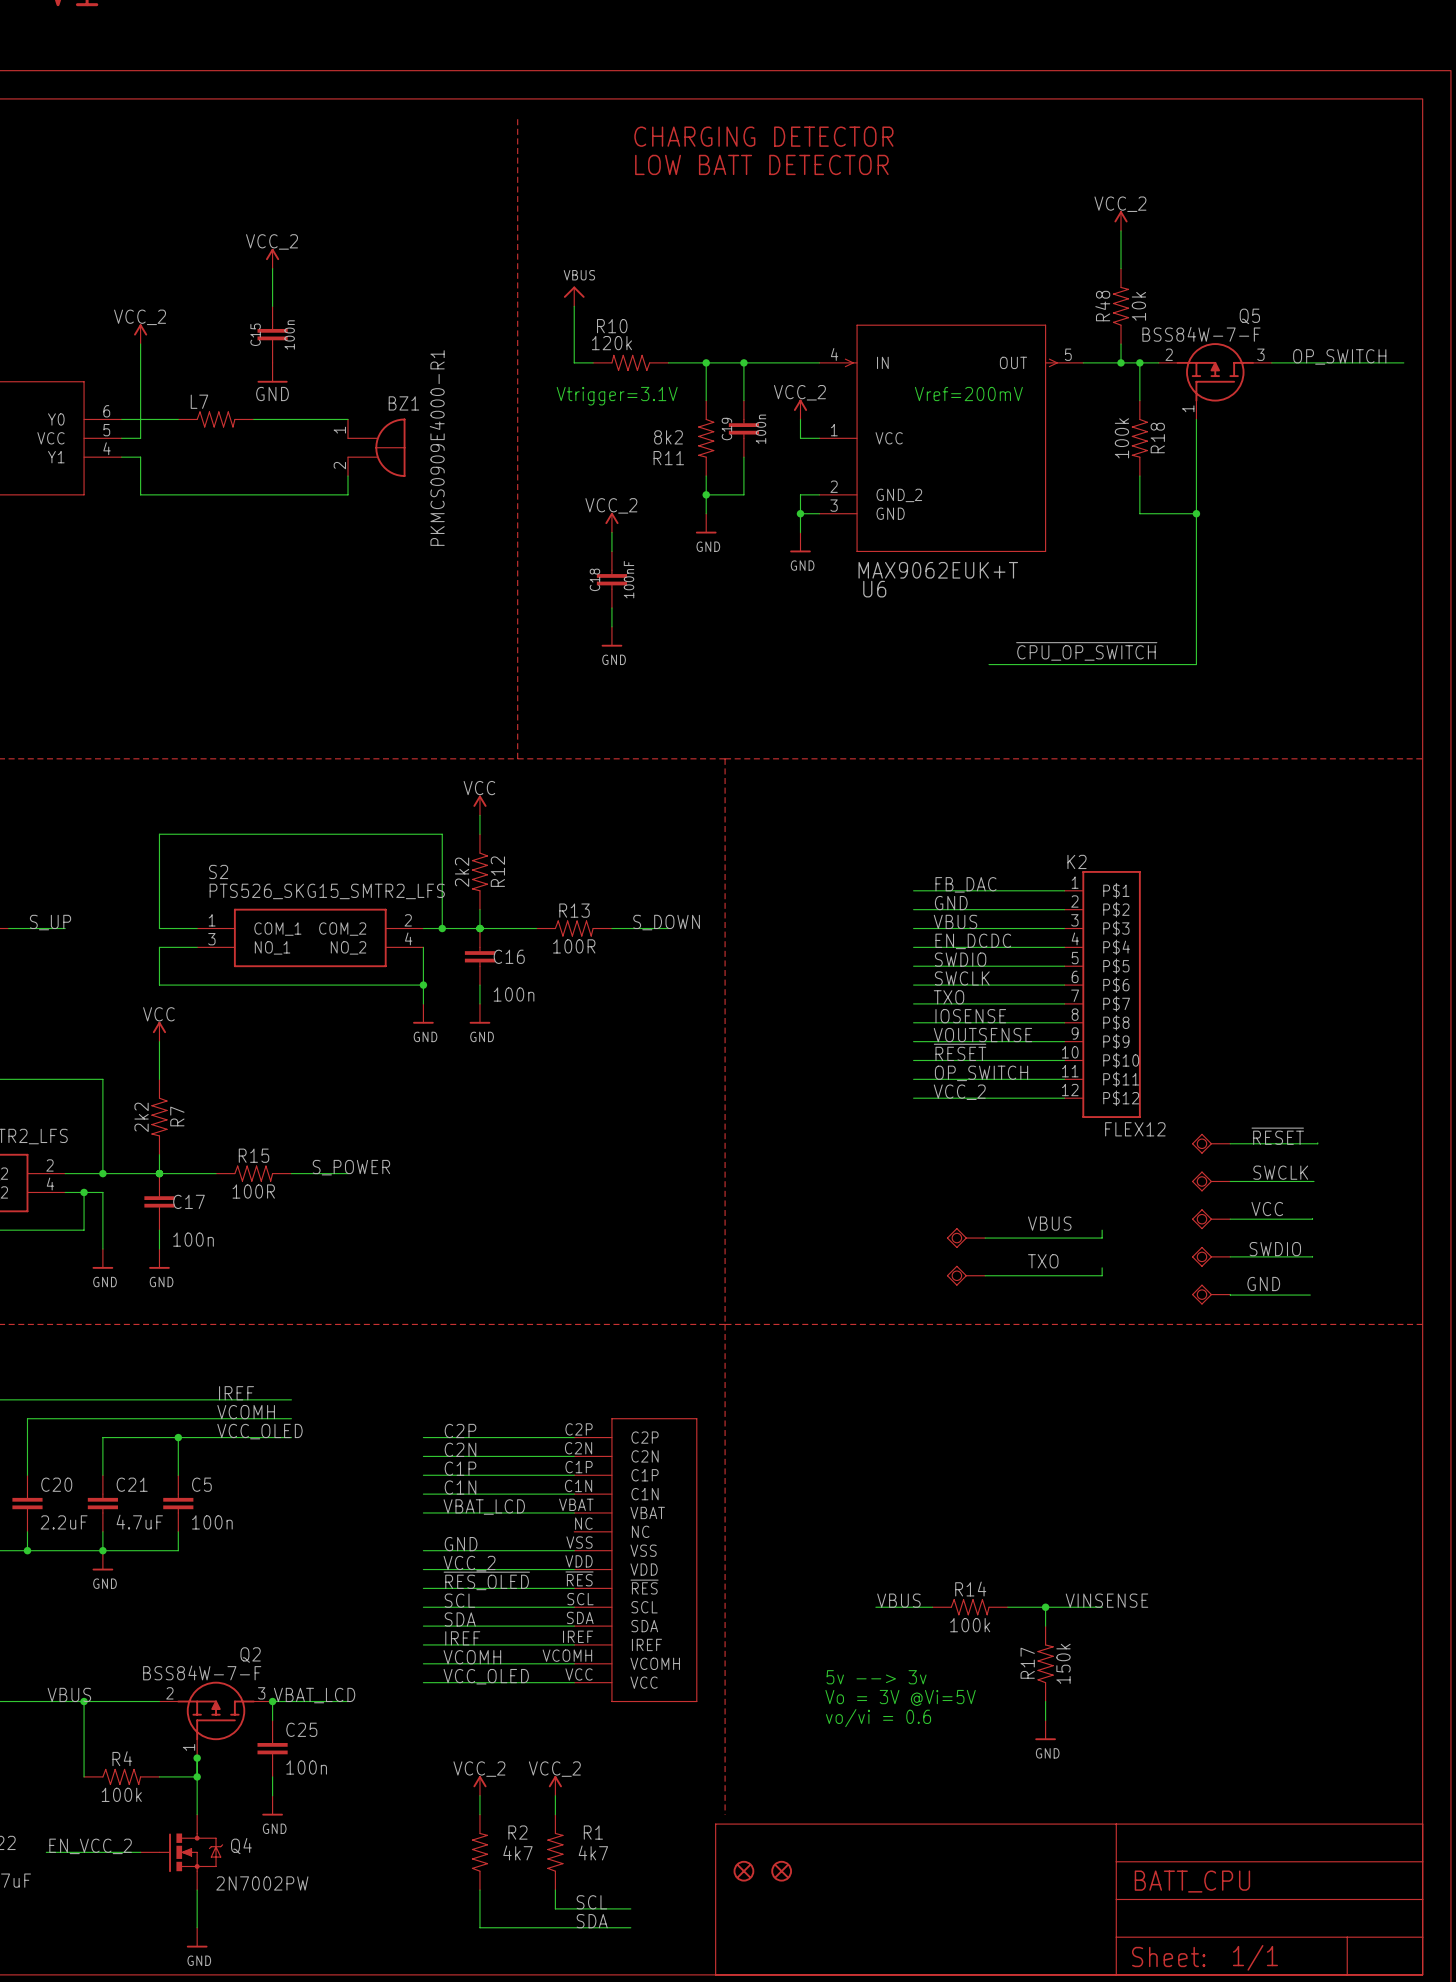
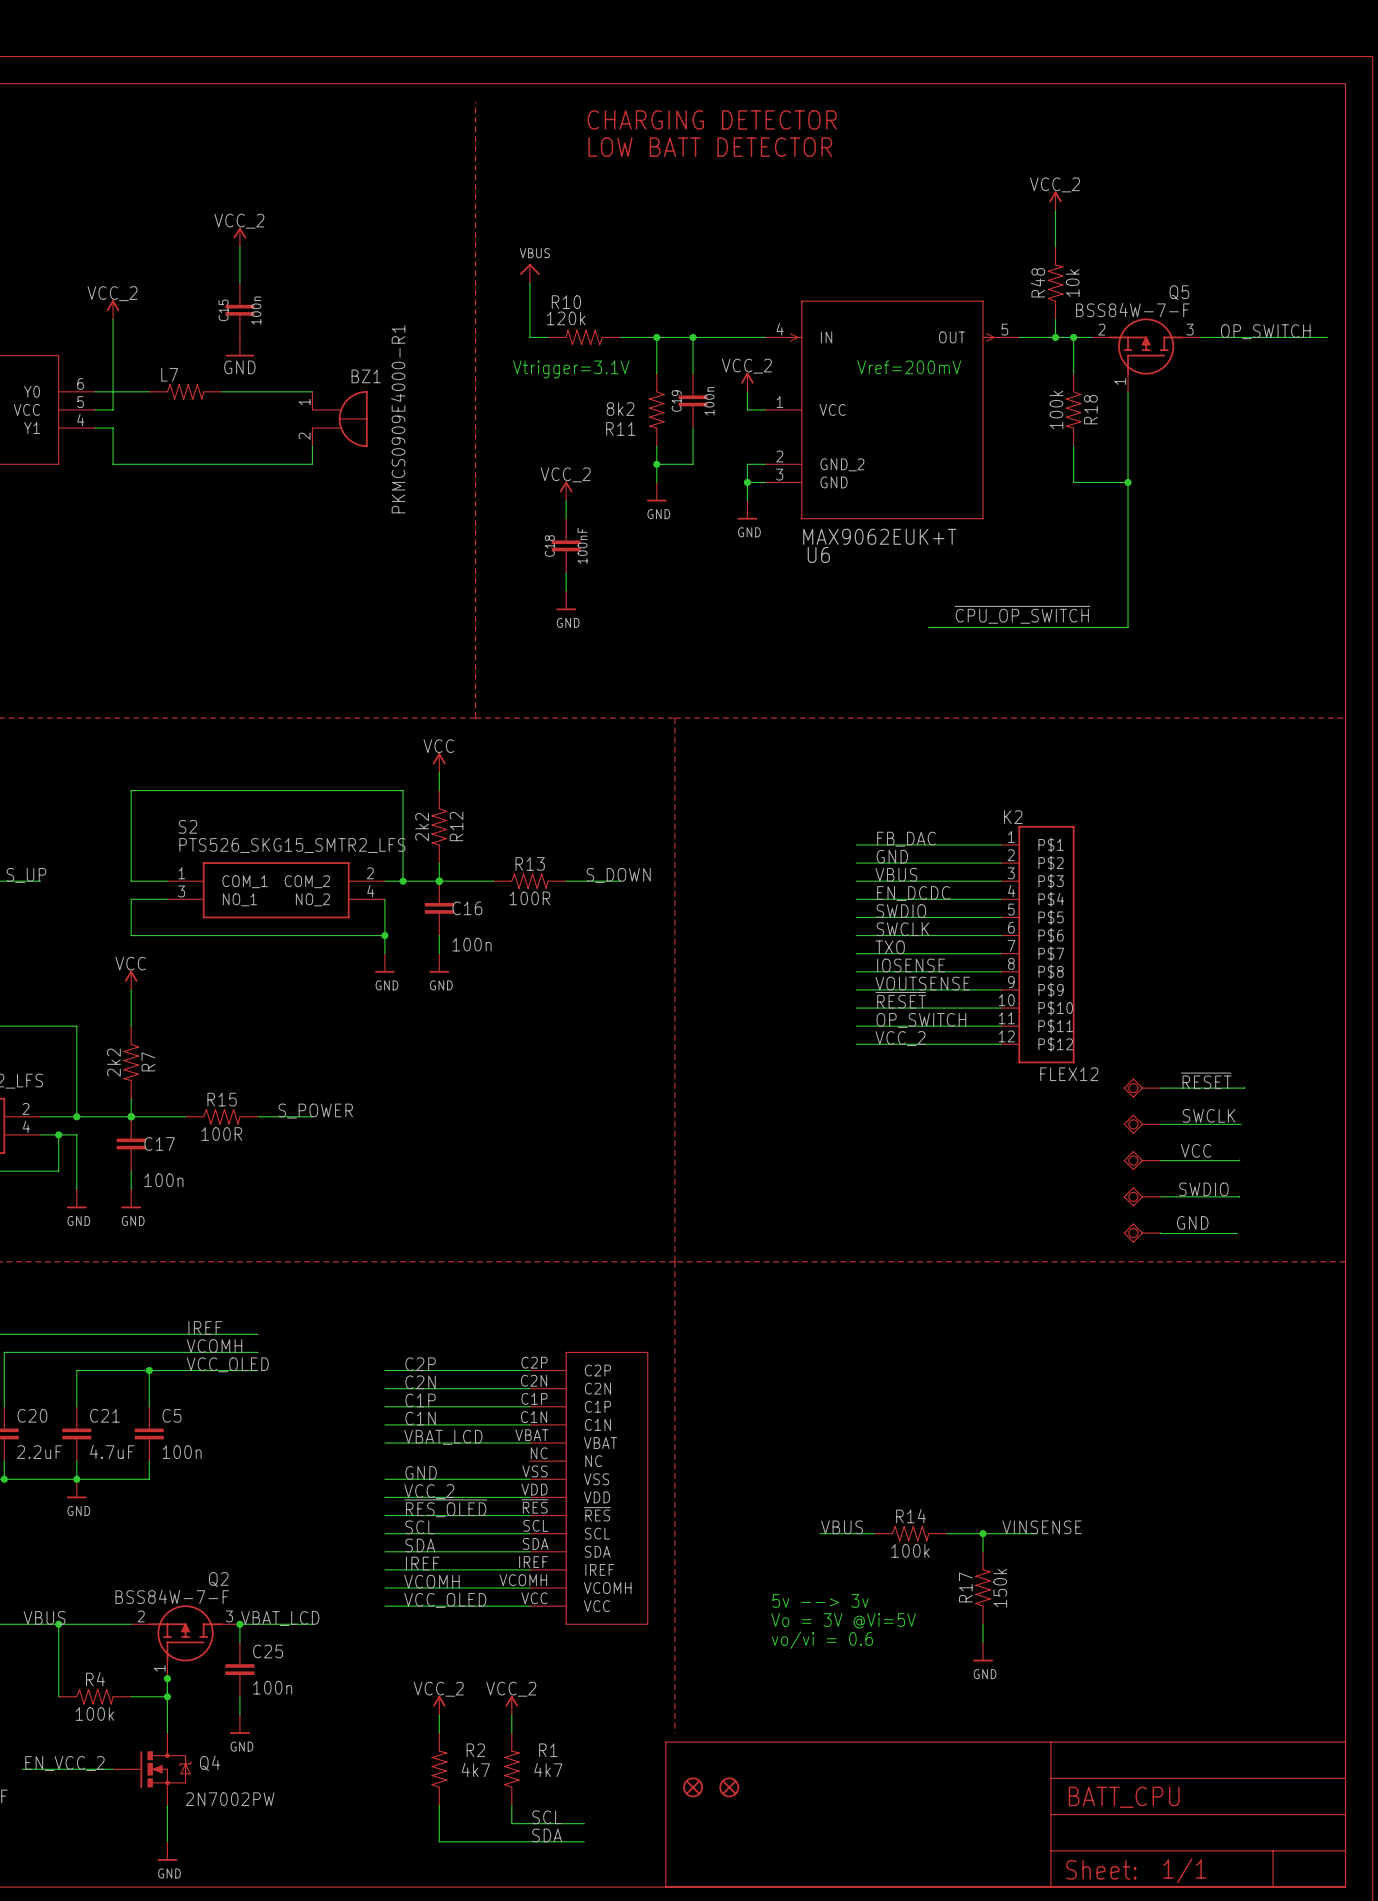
label: VBUS (1049, 1223) -> none
wire: (1102, 1230) (1102, 1238) (985, 1238) -> none
part: (966, 1238) -> none
label: TXO (1043, 1261) -> none
wire: (1102, 1267) (1102, 1275) (985, 1275) -> none
part: (966, 1275) -> none

